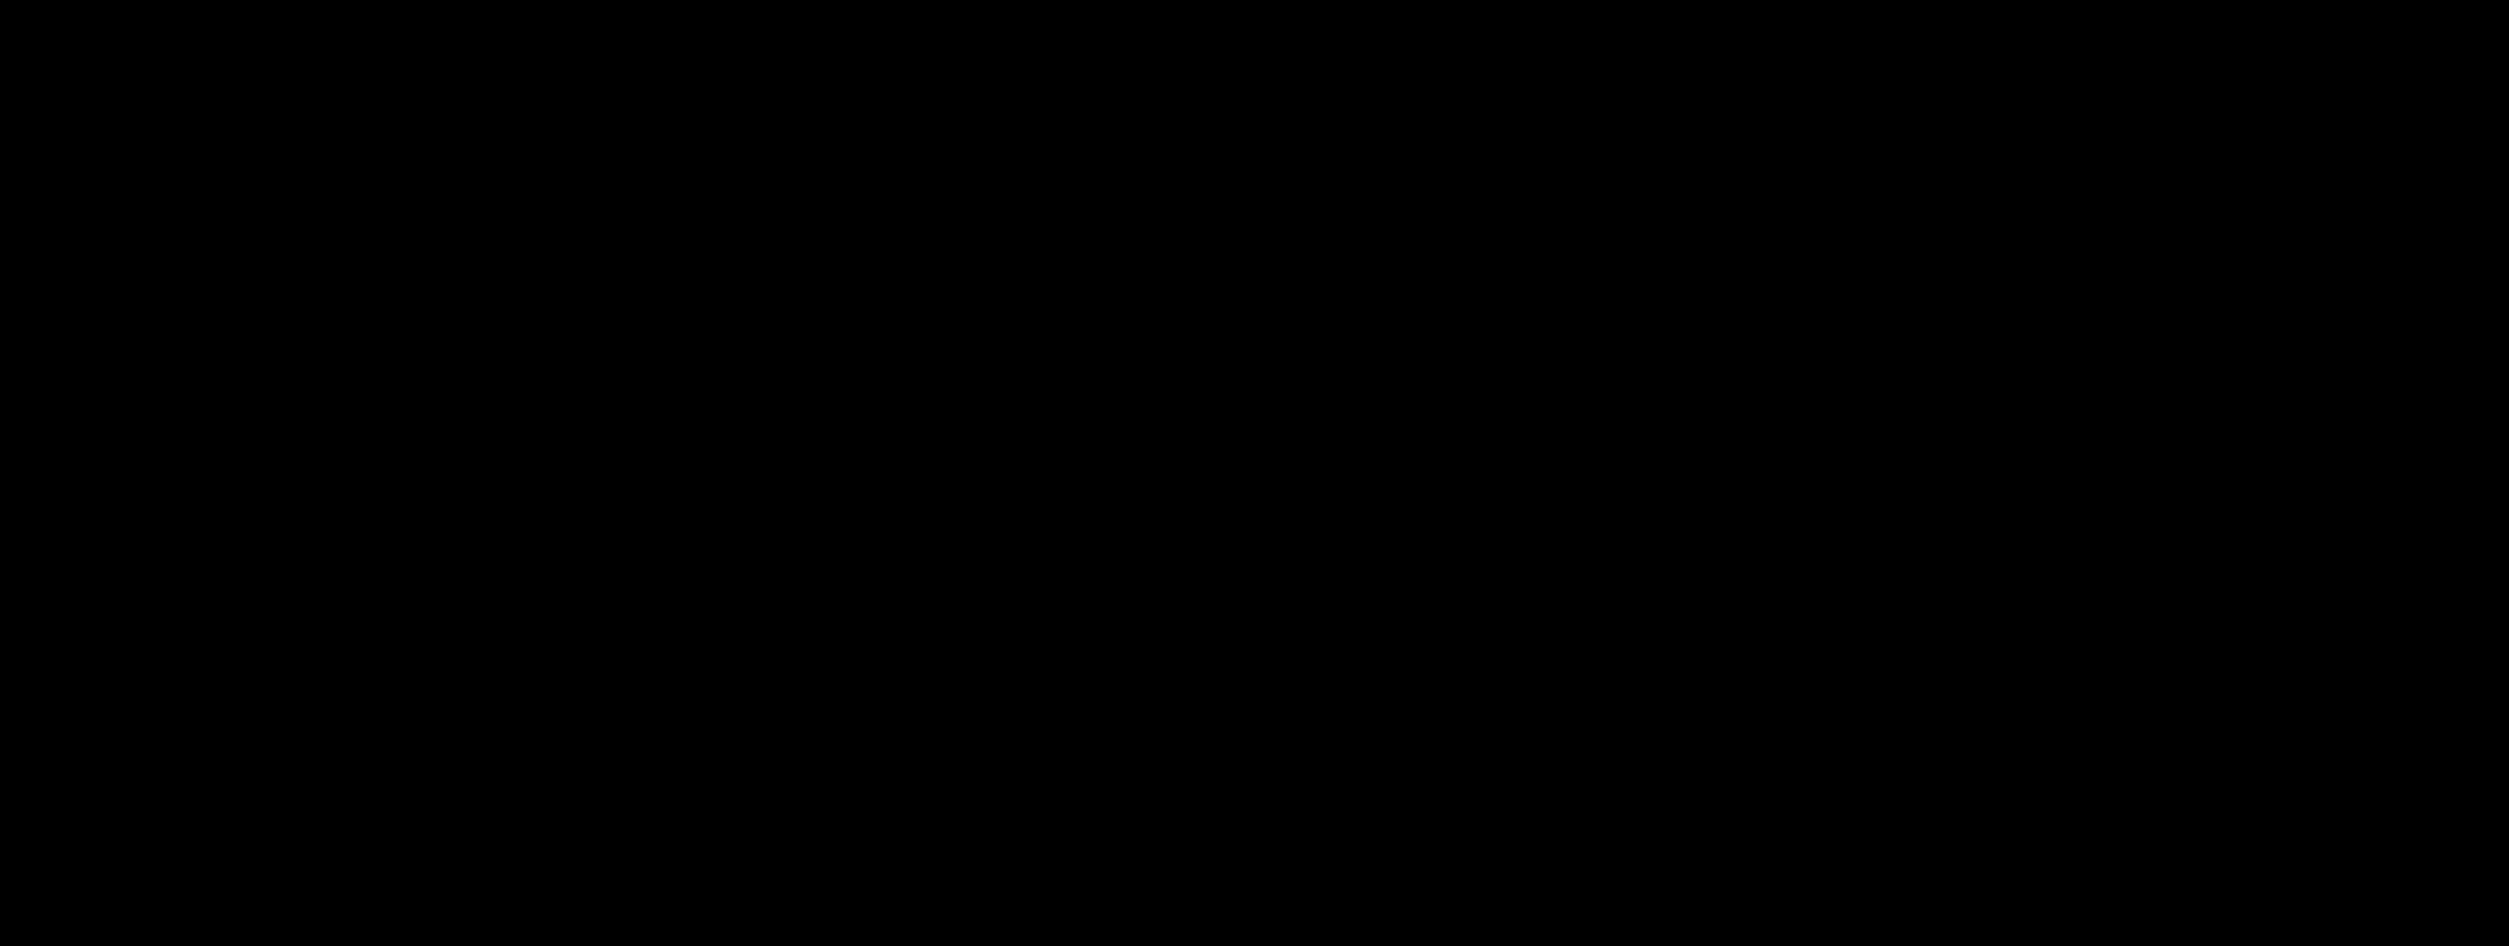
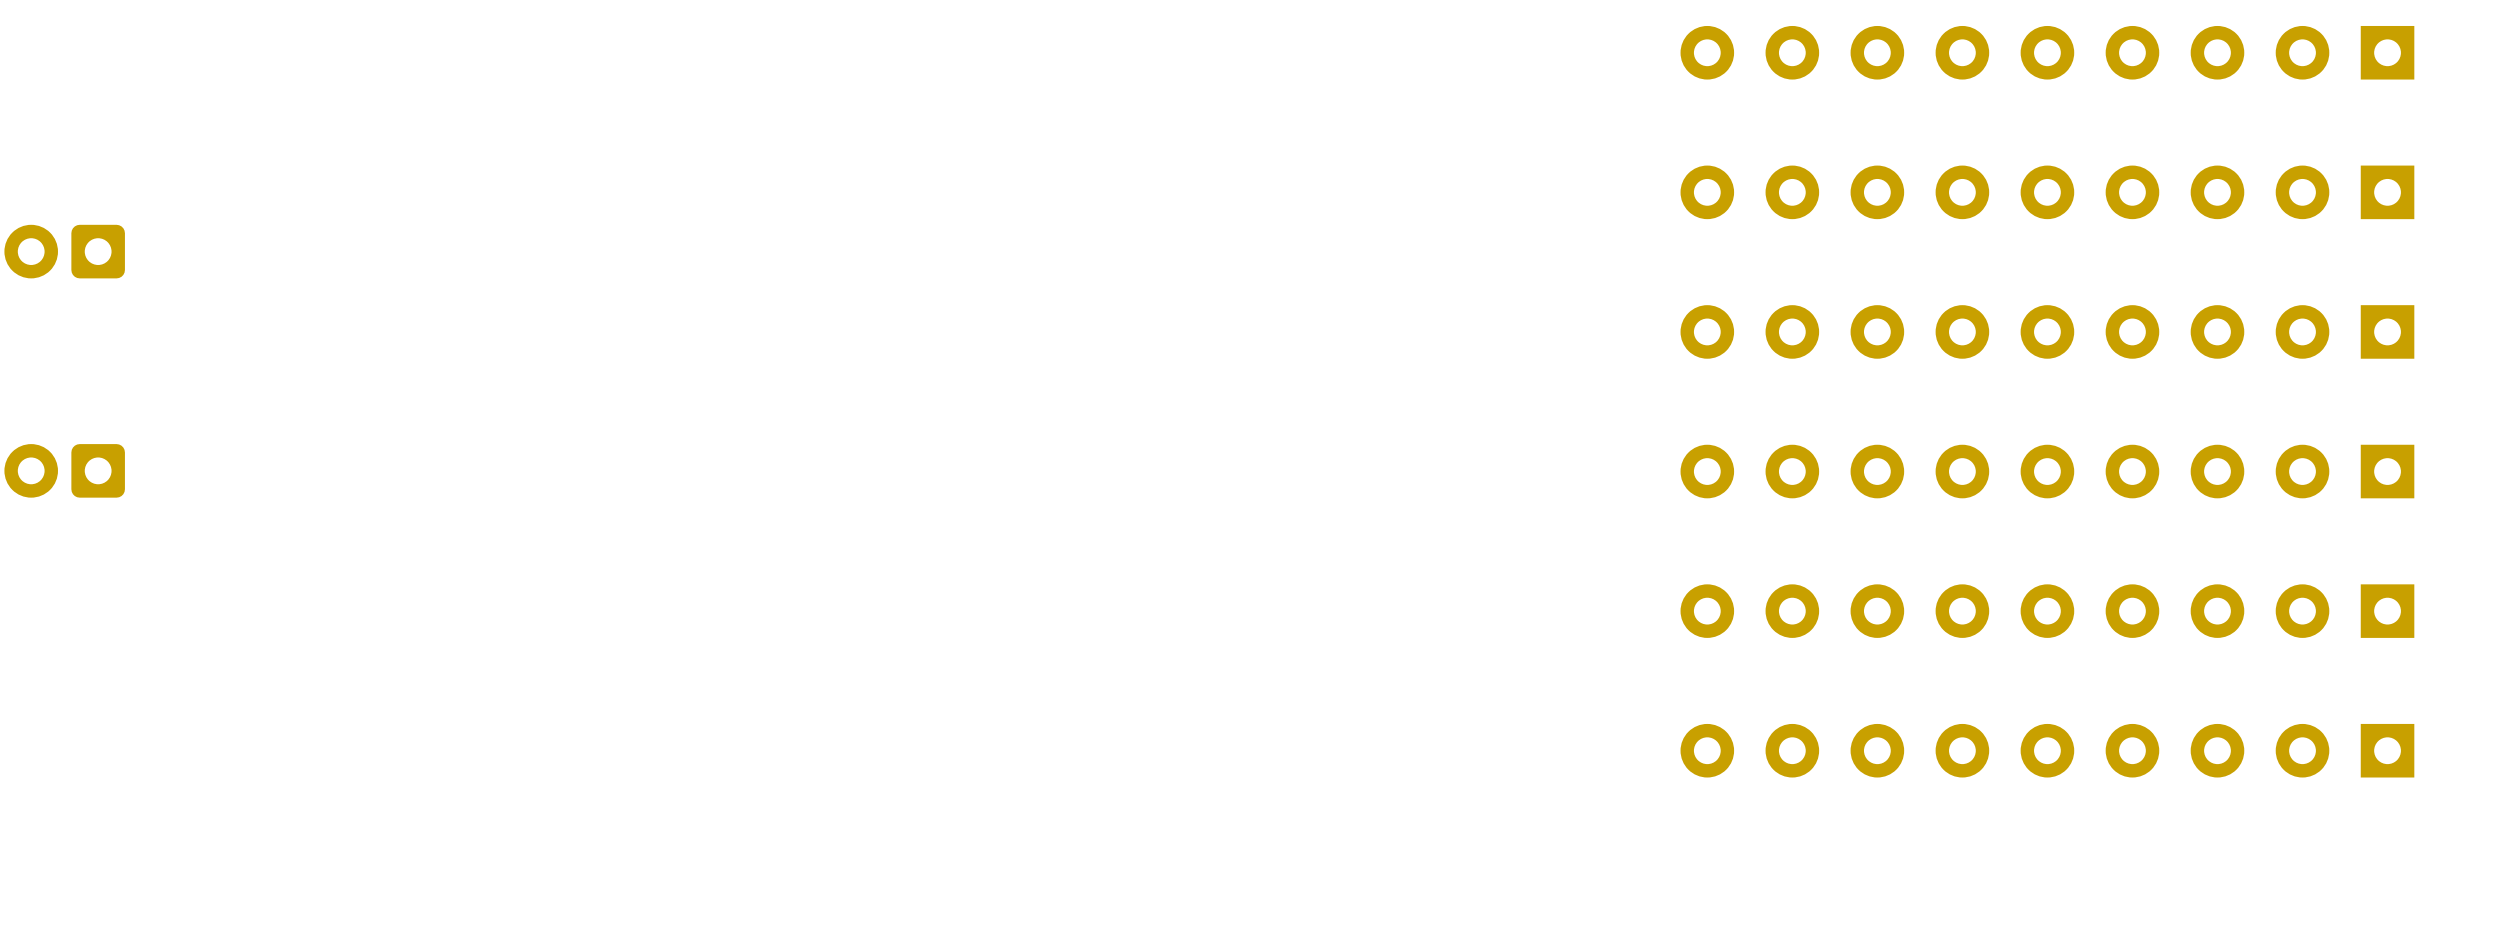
part: none -> (2047, 52)
part: none -> (2047, 192)
part: none -> (64, 251)
part: none -> (2047, 331)
part: none -> (64, 470)
part: none -> (2047, 471)
part: none -> (2047, 611)
part: none -> (2047, 750)

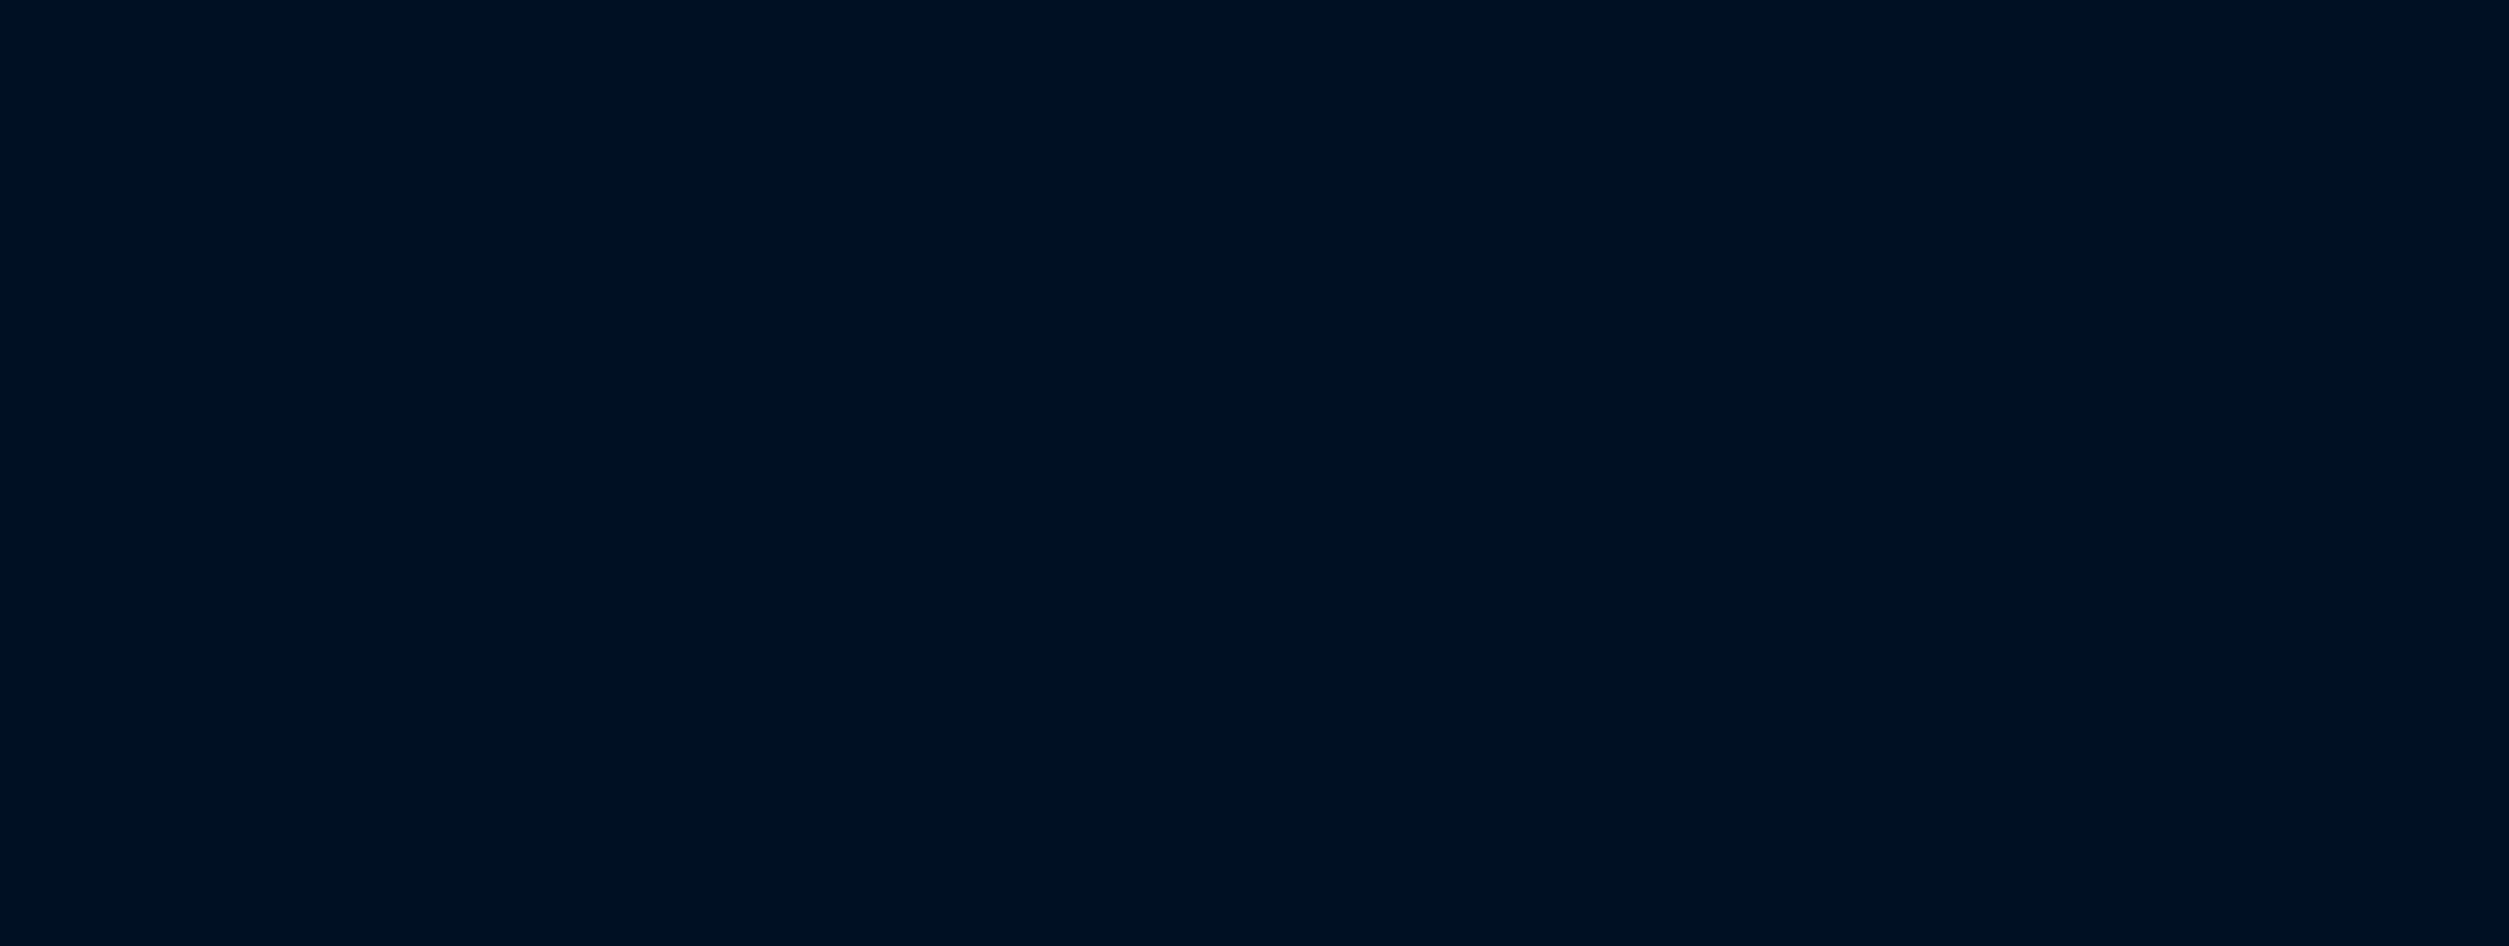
part: (2047, 52) -> none
part: (2047, 192) -> none
part: (64, 251) -> none
part: (2047, 331) -> none
part: (64, 470) -> none
part: (2047, 471) -> none
part: (2047, 611) -> none
part: (2047, 750) -> none

